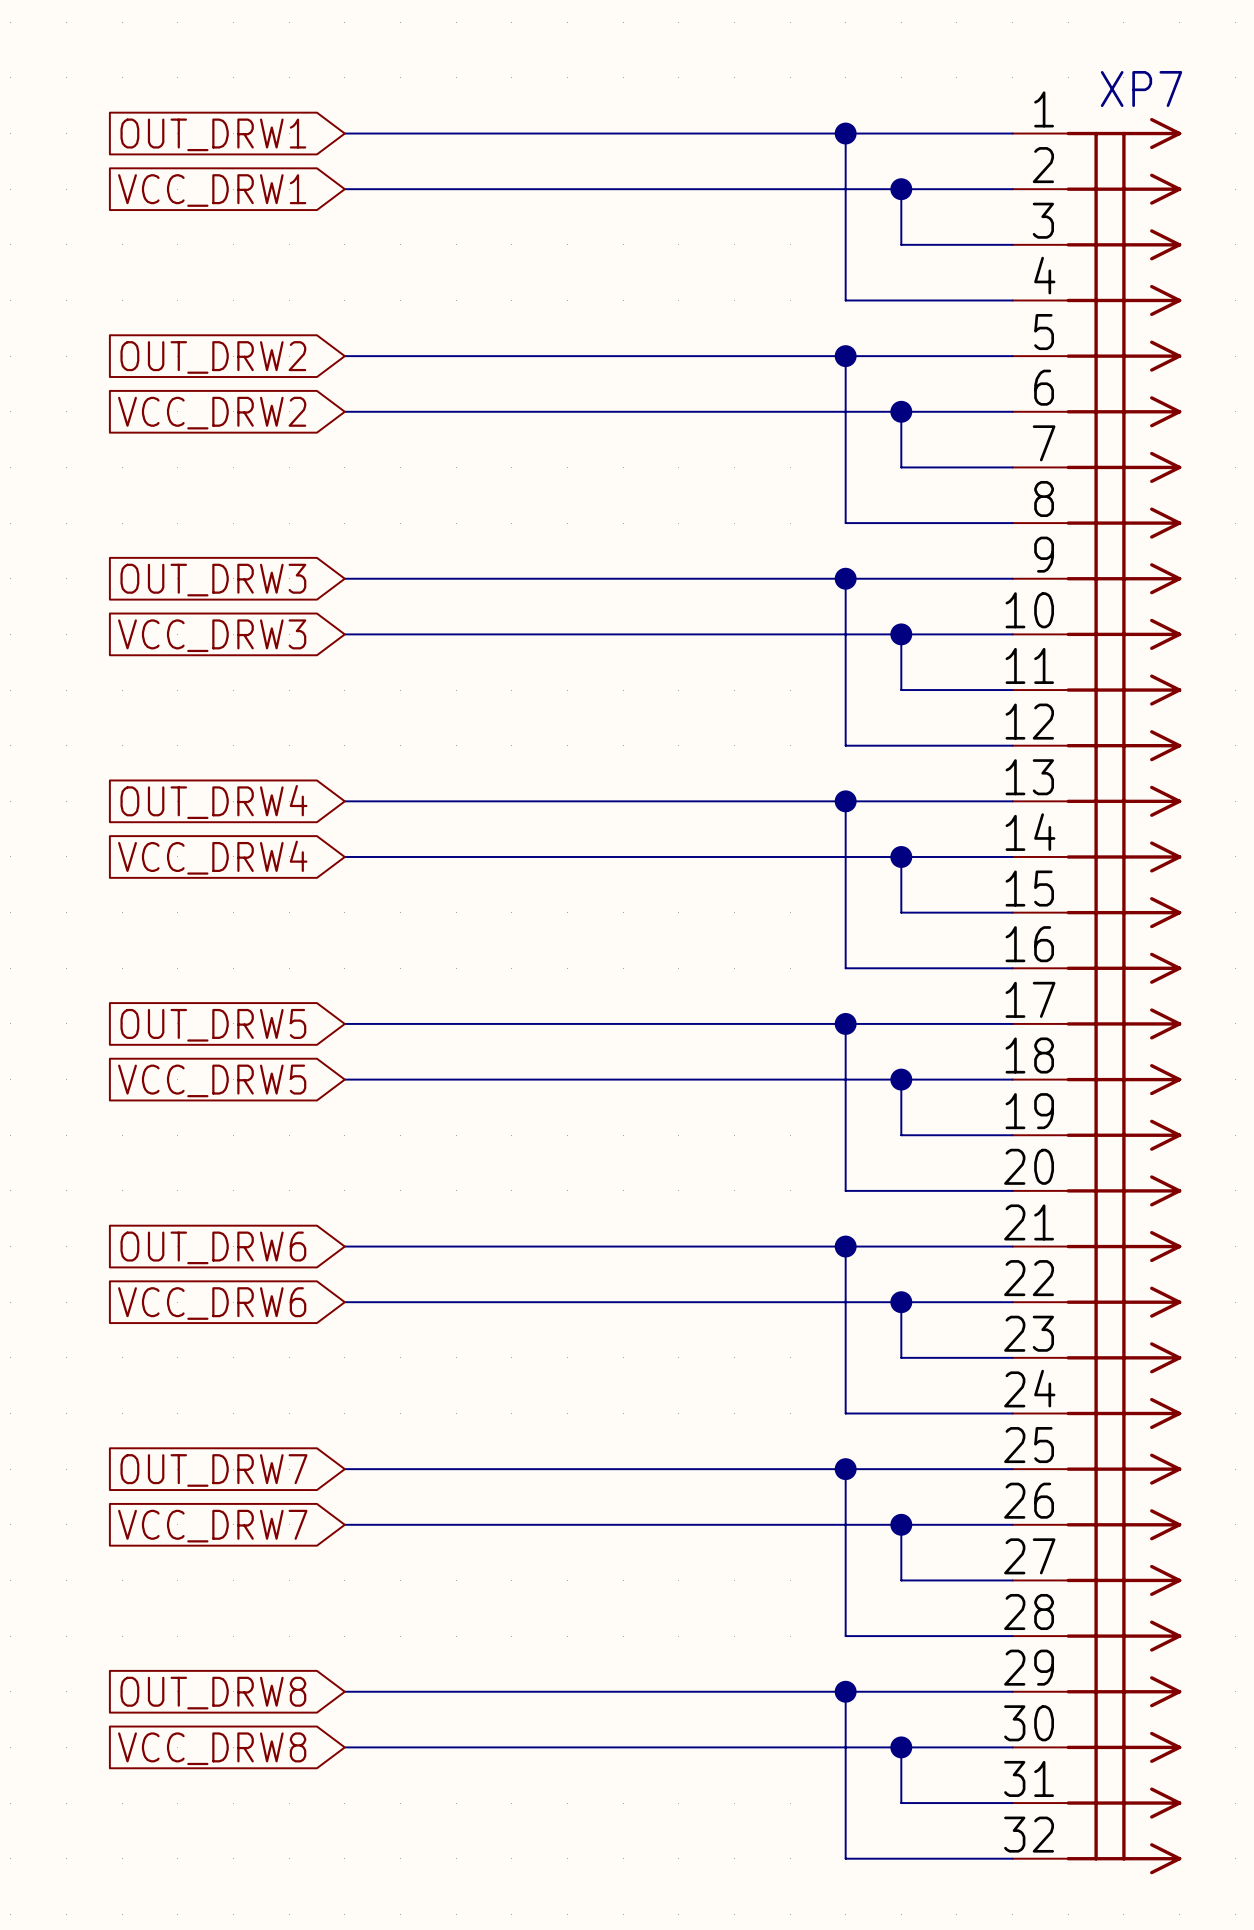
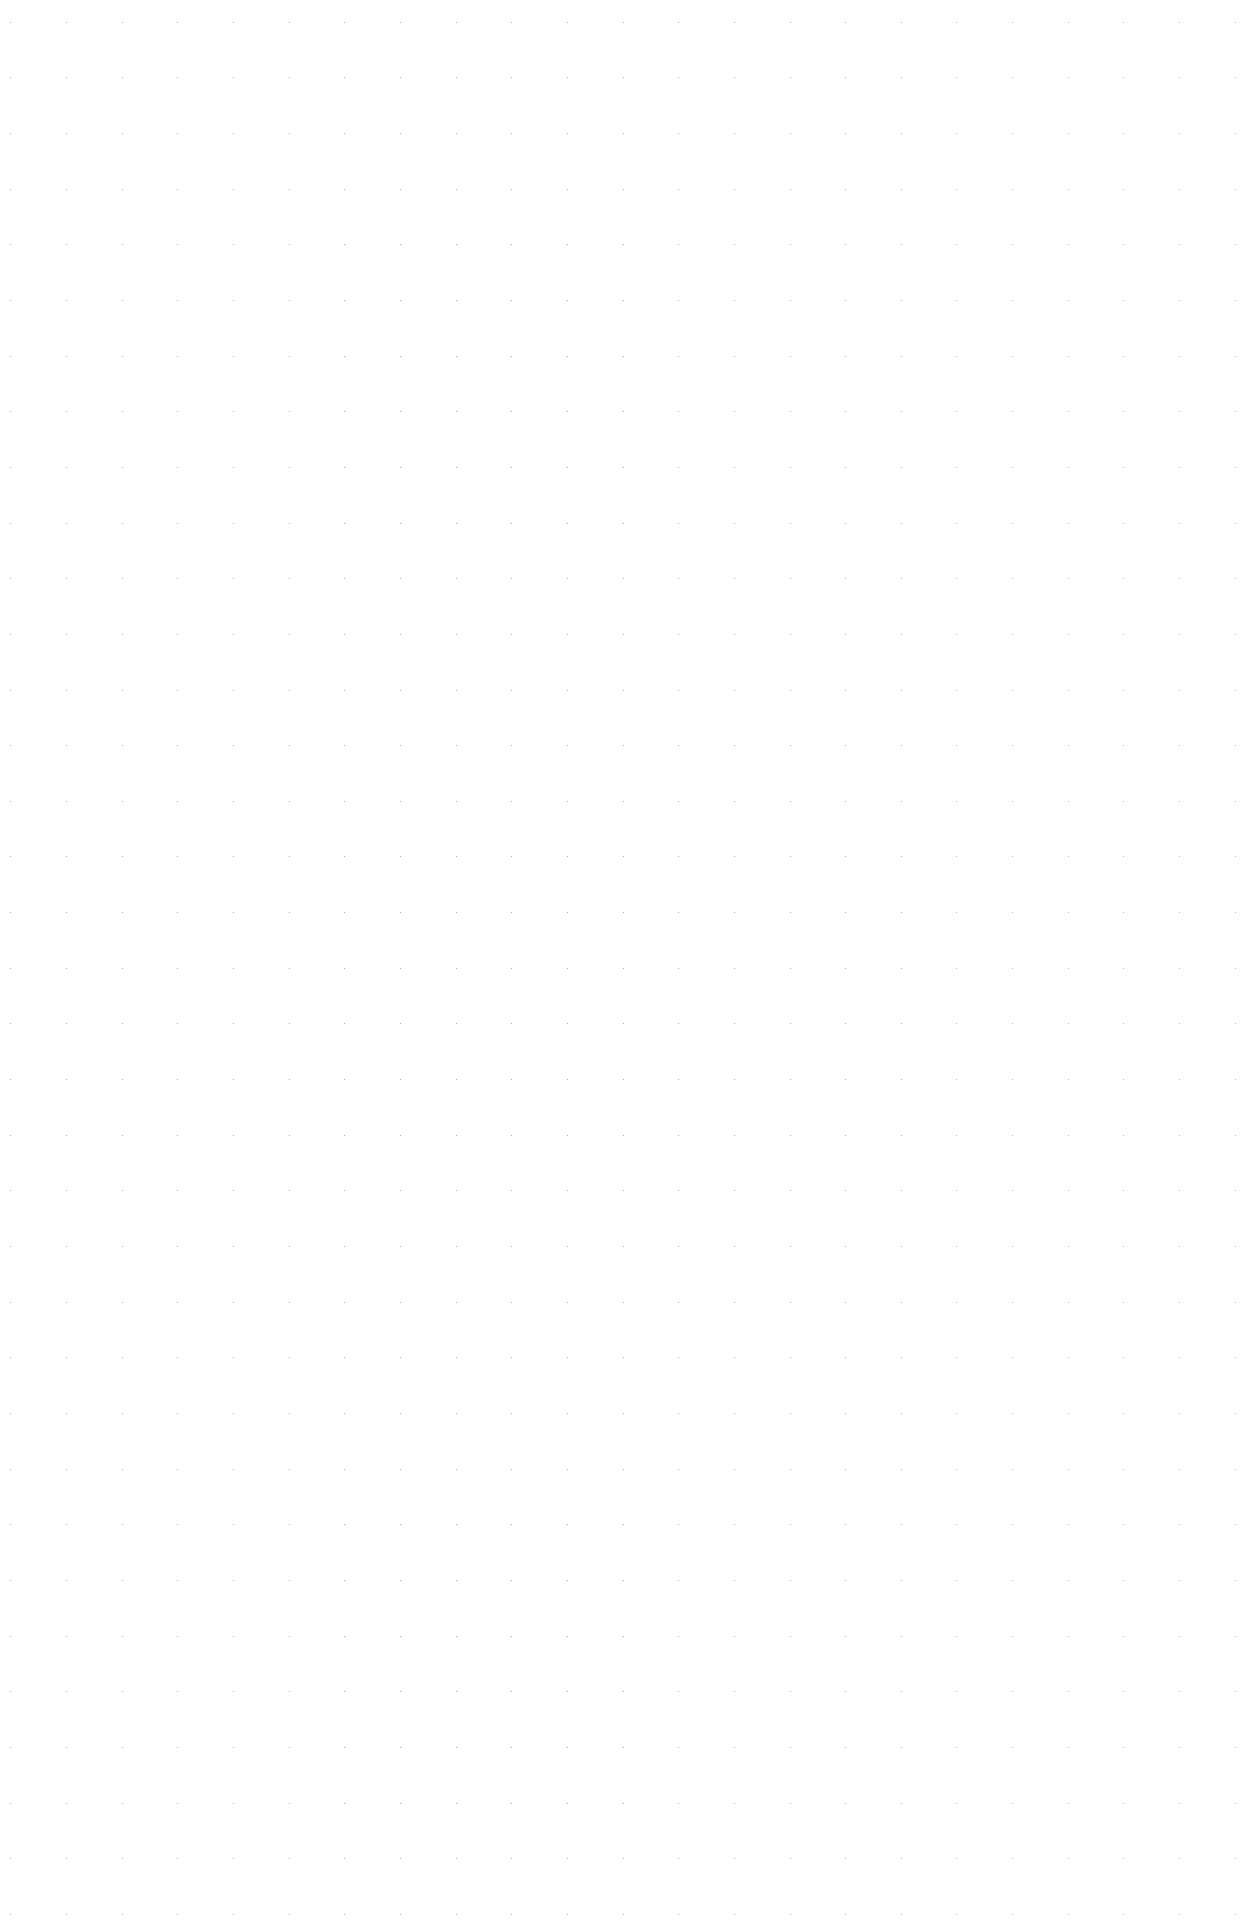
wire: (344, 133) (1012, 133) -> none
wire: (845, 133) (845, 300) (1012, 300) -> none
junction: (845, 133) -> none
global label: OUT_DRW1 (213, 134) -> none
wire: (344, 189) (1012, 189) -> none
wire: (901, 189) (901, 244) (1012, 244) -> none
junction: (901, 189) -> none
global label: VCC_DRW1 (212, 190) -> none
wire: (344, 356) (1012, 356) -> none
wire: (845, 356) (845, 523) (1012, 523) -> none
junction: (845, 356) -> none
global label: OUT_DRW2 (213, 357) -> none
wire: (344, 411) (1012, 411) -> none
wire: (901, 411) (901, 467) (1012, 467) -> none
junction: (901, 411) -> none
global label: VCC_DRW2 (212, 413) -> none
wire: (344, 578) (1012, 578) -> none
wire: (845, 578) (845, 745) (1012, 745) -> none
junction: (845, 578) -> none
global label: OUT_DRW3 (213, 580) -> none
wire: (344, 634) (1012, 634) -> none
wire: (901, 634) (901, 690) (1012, 690) -> none
junction: (901, 634) -> none
global label: VCC_DRW3 (212, 635) -> none
wire: (344, 801) (1012, 801) -> none
wire: (845, 801) (845, 968) (1012, 968) -> none
junction: (845, 801) -> none
global label: OUT_DRW4 (213, 802) -> none
wire: (344, 856) (1012, 856) -> none
wire: (901, 856) (901, 912) (1012, 912) -> none
junction: (901, 856) -> none
global label: VCC_DRW4 (212, 857) -> none
XP7: (1096, 996) -> none
wire: (344, 1023) (1012, 1023) -> none
wire: (845, 1023) (845, 1190) (1012, 1190) -> none
junction: (845, 1023) -> none
global label: OUT_DRW5 (213, 1025) -> none
wire: (344, 1079) (1012, 1079) -> none
wire: (901, 1079) (901, 1135) (1012, 1135) -> none
junction: (901, 1079) -> none
global label: VCC_DRW5 (212, 1080) -> none
wire: (344, 1246) (1012, 1246) -> none
wire: (845, 1246) (845, 1413) (1012, 1413) -> none
junction: (845, 1246) -> none
global label: OUT_DRW6 (213, 1247) -> none
wire: (344, 1302) (1012, 1302) -> none
wire: (901, 1302) (901, 1357) (1012, 1357) -> none
junction: (901, 1302) -> none
global label: VCC_DRW6 (212, 1303) -> none
wire: (344, 1469) (1012, 1469) -> none
wire: (845, 1469) (845, 1636) (1012, 1636) -> none
junction: (845, 1469) -> none
global label: OUT_DRW7 (213, 1470) -> none
wire: (344, 1524) (1012, 1524) -> none
wire: (901, 1524) (901, 1580) (1012, 1580) -> none
junction: (901, 1524) -> none
global label: VCC_DRW7 (212, 1526) -> none
wire: (344, 1691) (1012, 1691) -> none
wire: (845, 1691) (845, 1858) (1012, 1858) -> none
junction: (845, 1691) -> none
global label: OUT_DRW8 (213, 1693) -> none
wire: (344, 1747) (1012, 1747) -> none
wire: (901, 1747) (901, 1803) (1012, 1803) -> none
junction: (901, 1747) -> none
global label: VCC_DRW8 (212, 1748) -> none

